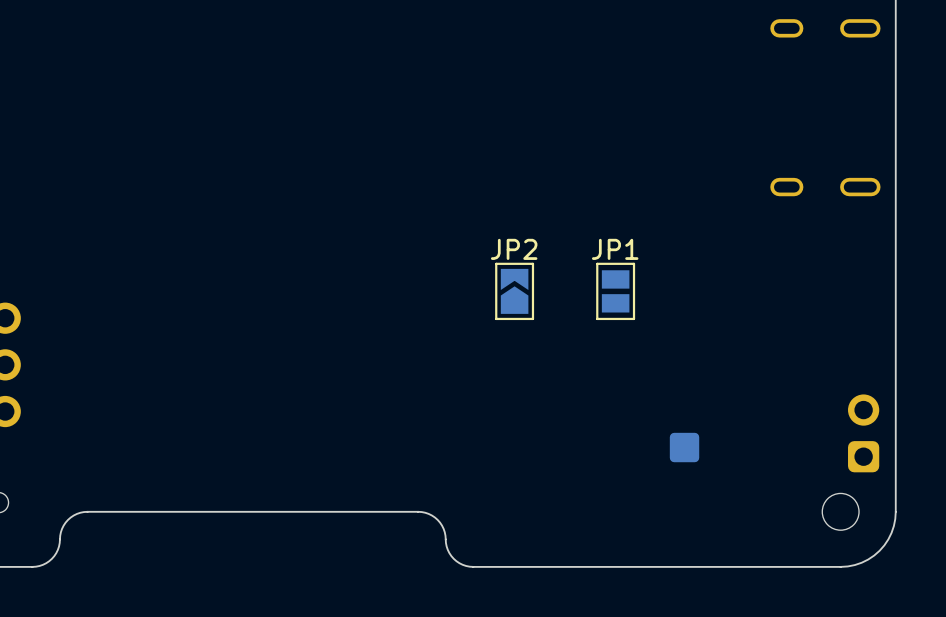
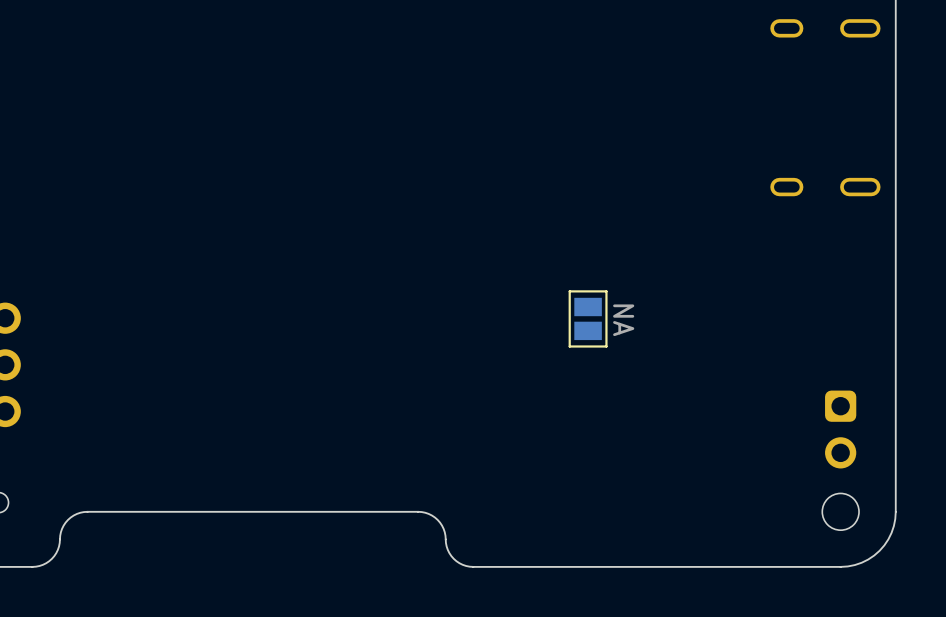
JP2: (514, 291) -> none
JP1: (615, 291) -> none
part: none -> NA (588, 318)
part rotation: 0° (863, 433) -> 180° (840, 429)
part: (684, 447) -> none

